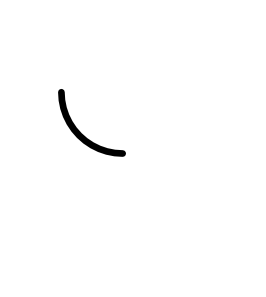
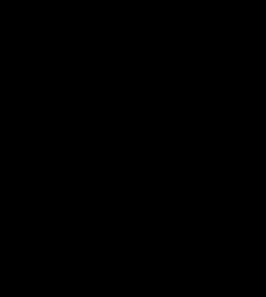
board edge: (61, 92) (66, 115) (79, 135) (99, 148) (122, 153) -> none

